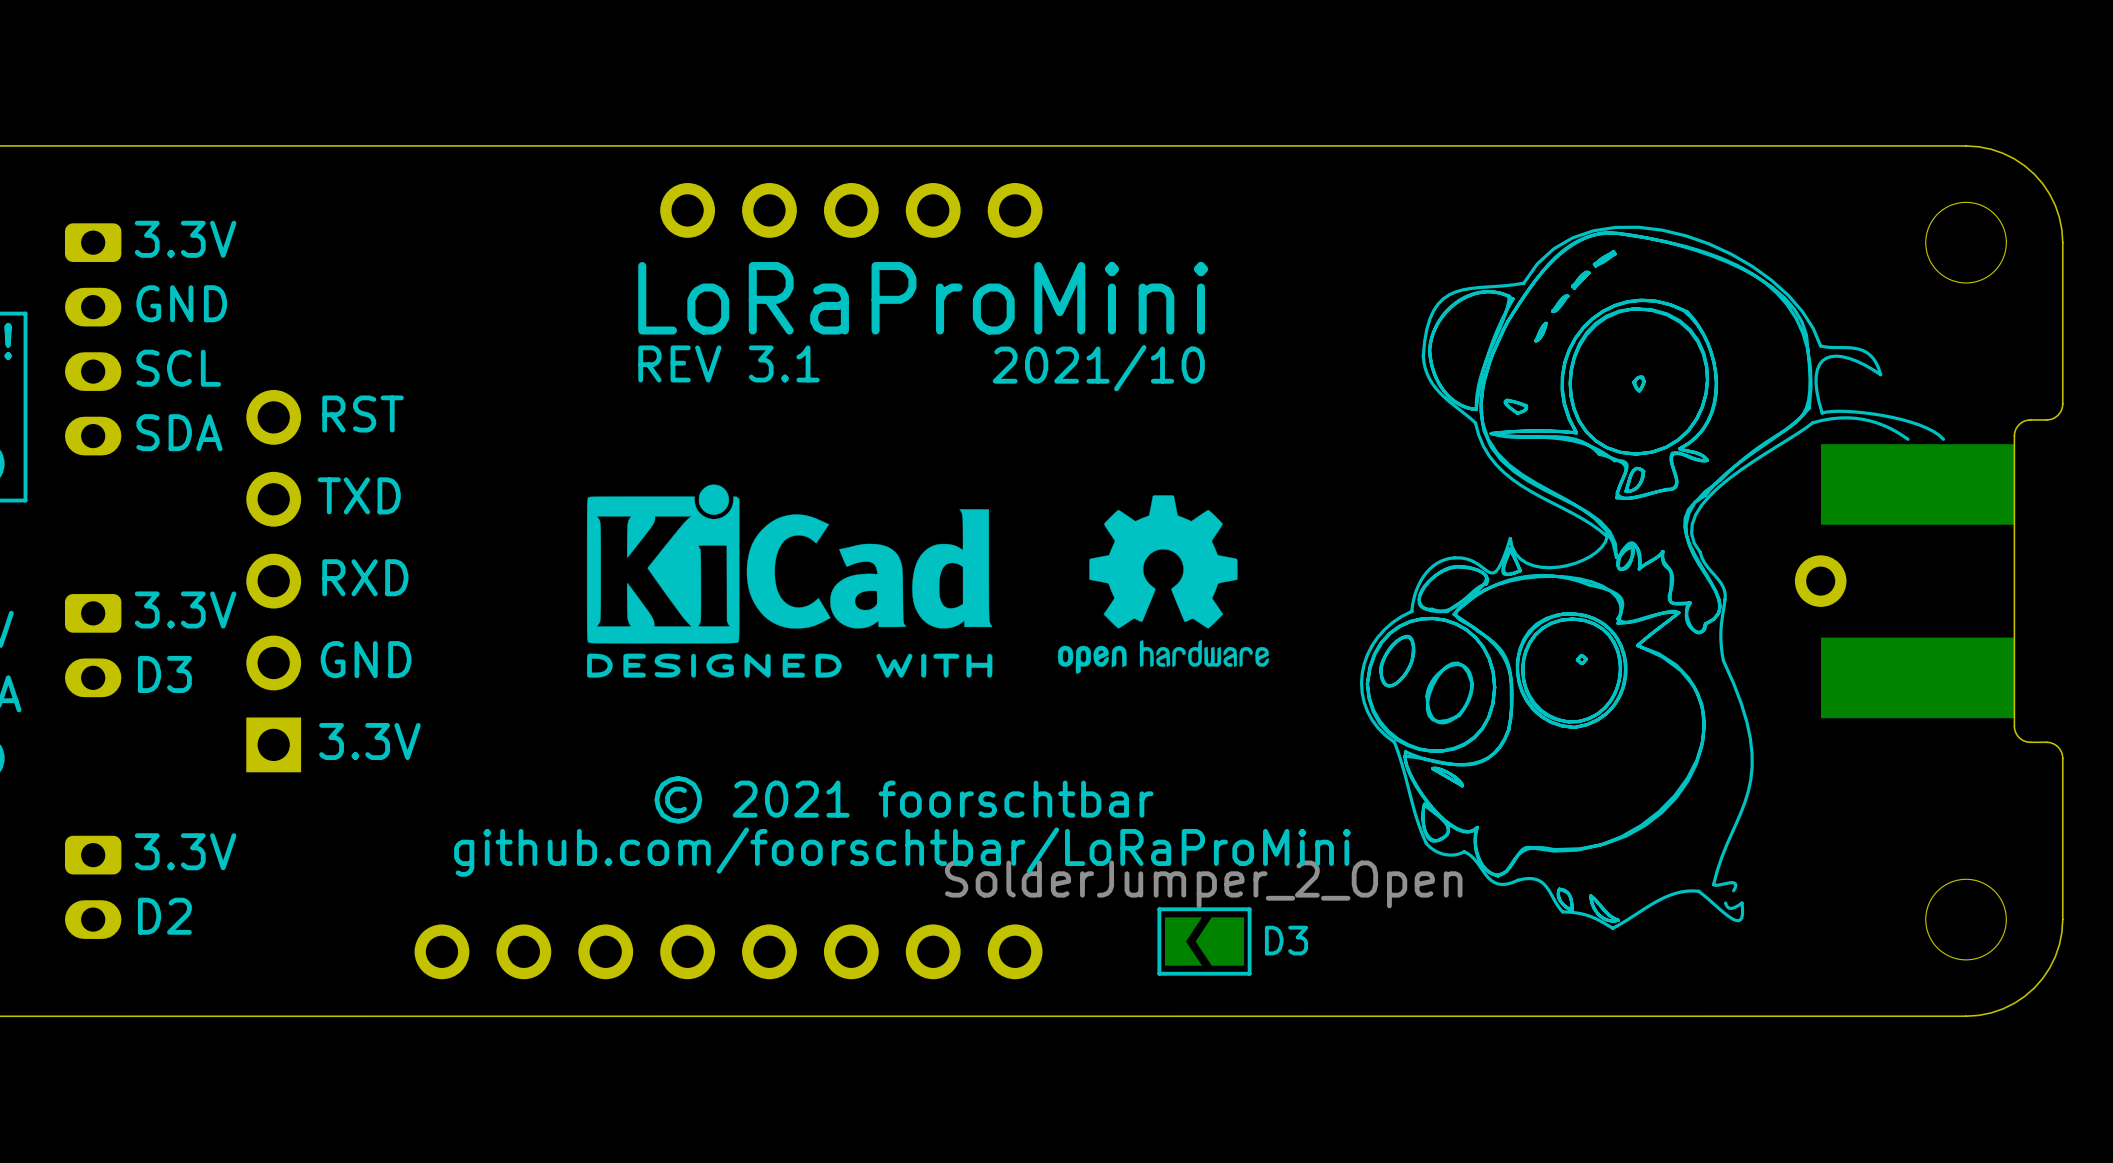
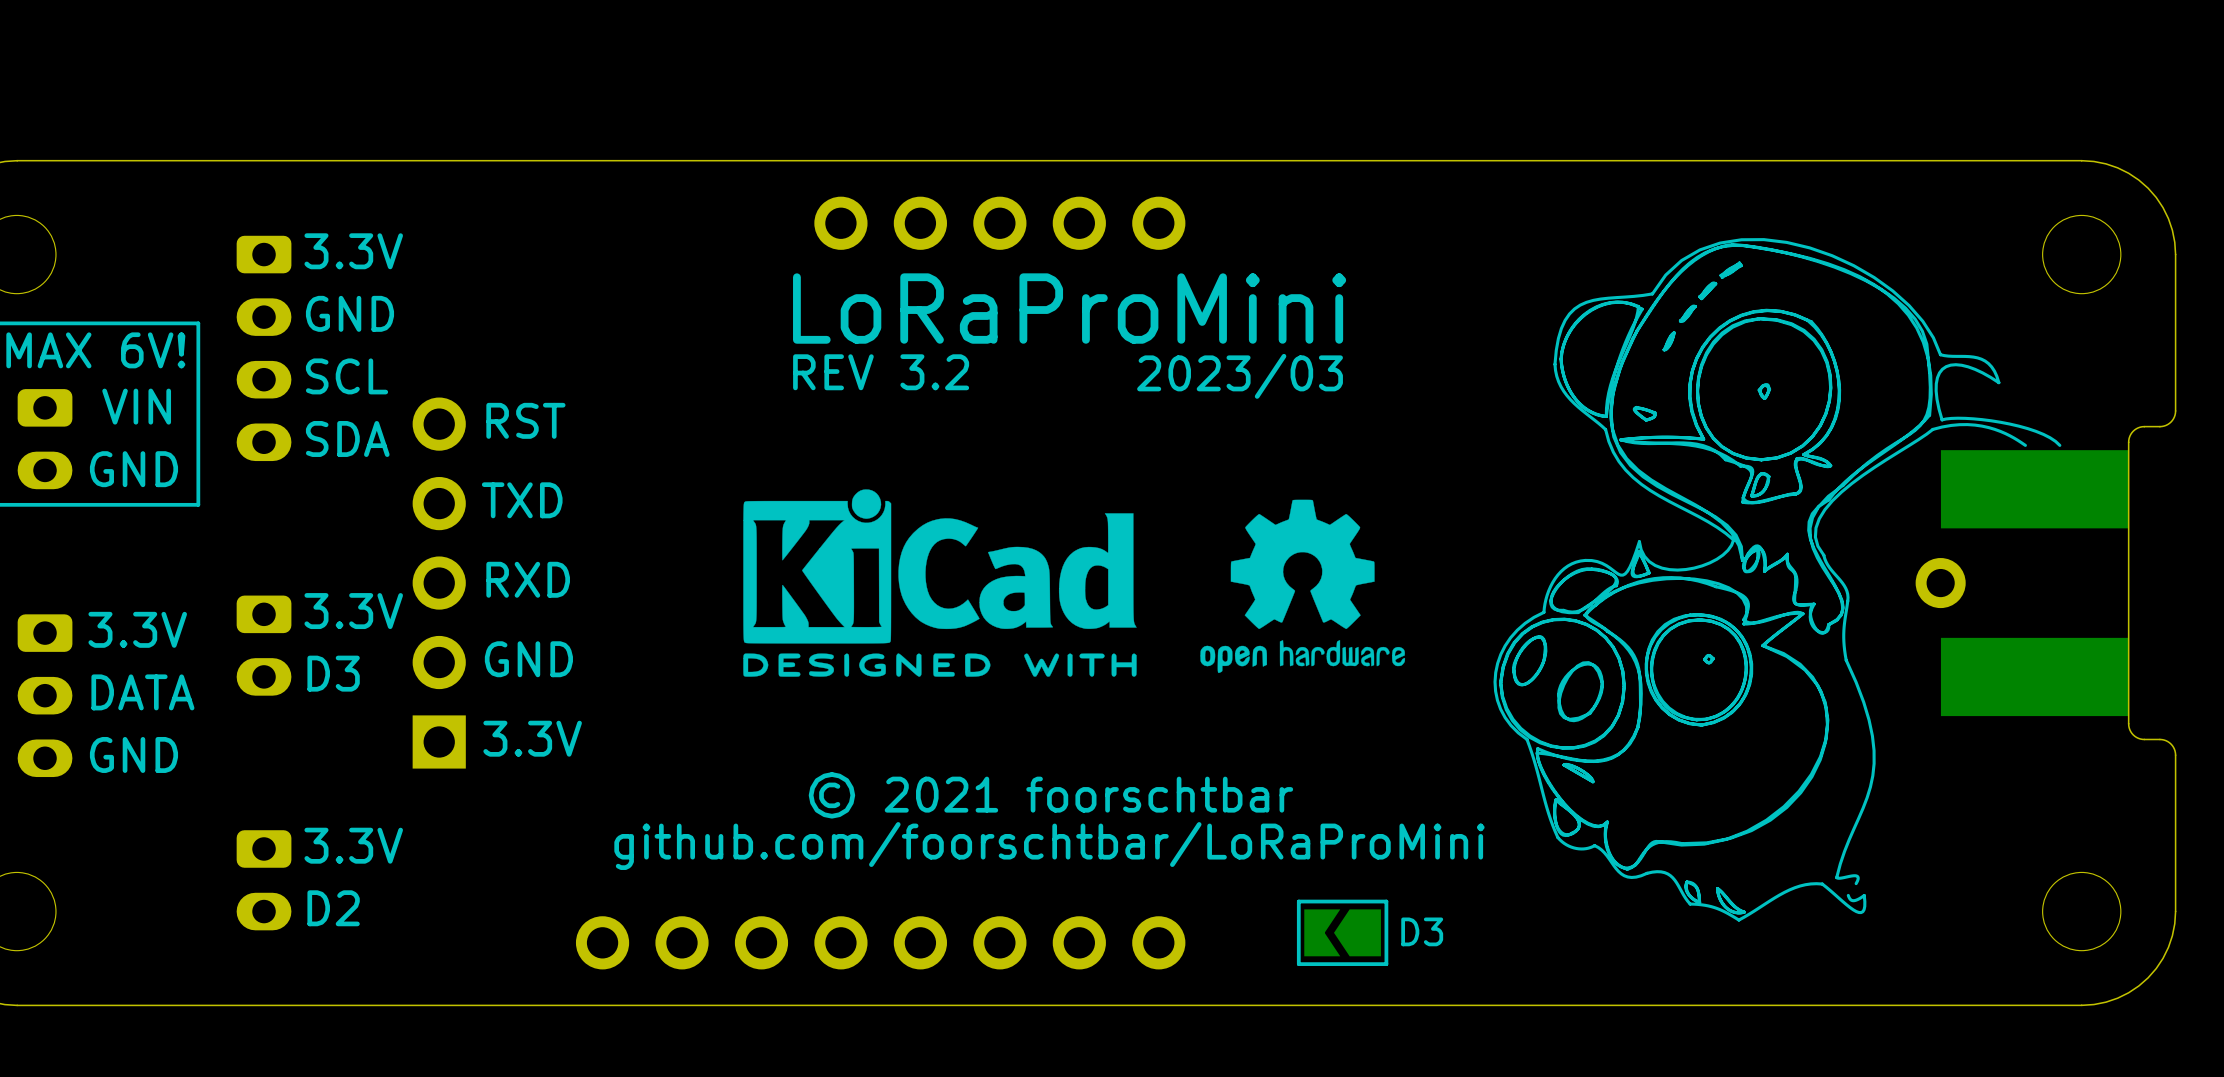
text: REV 3.1 (728, 363) -> REV 3.2 (881, 372)
text: 2021/10 (1098, 368) -> 2023/03 (1240, 376)
part value: SolderJumper_2_Open (1203, 884) -> none

